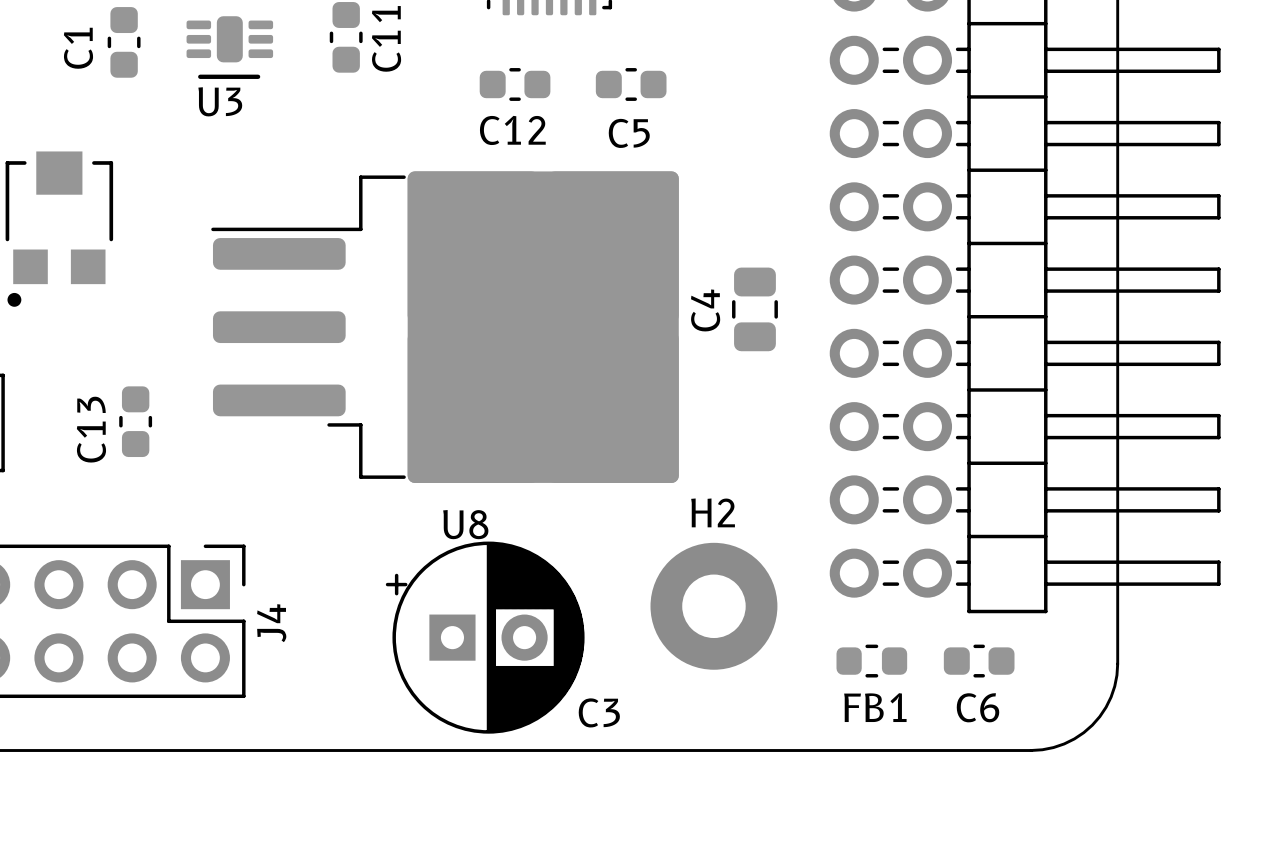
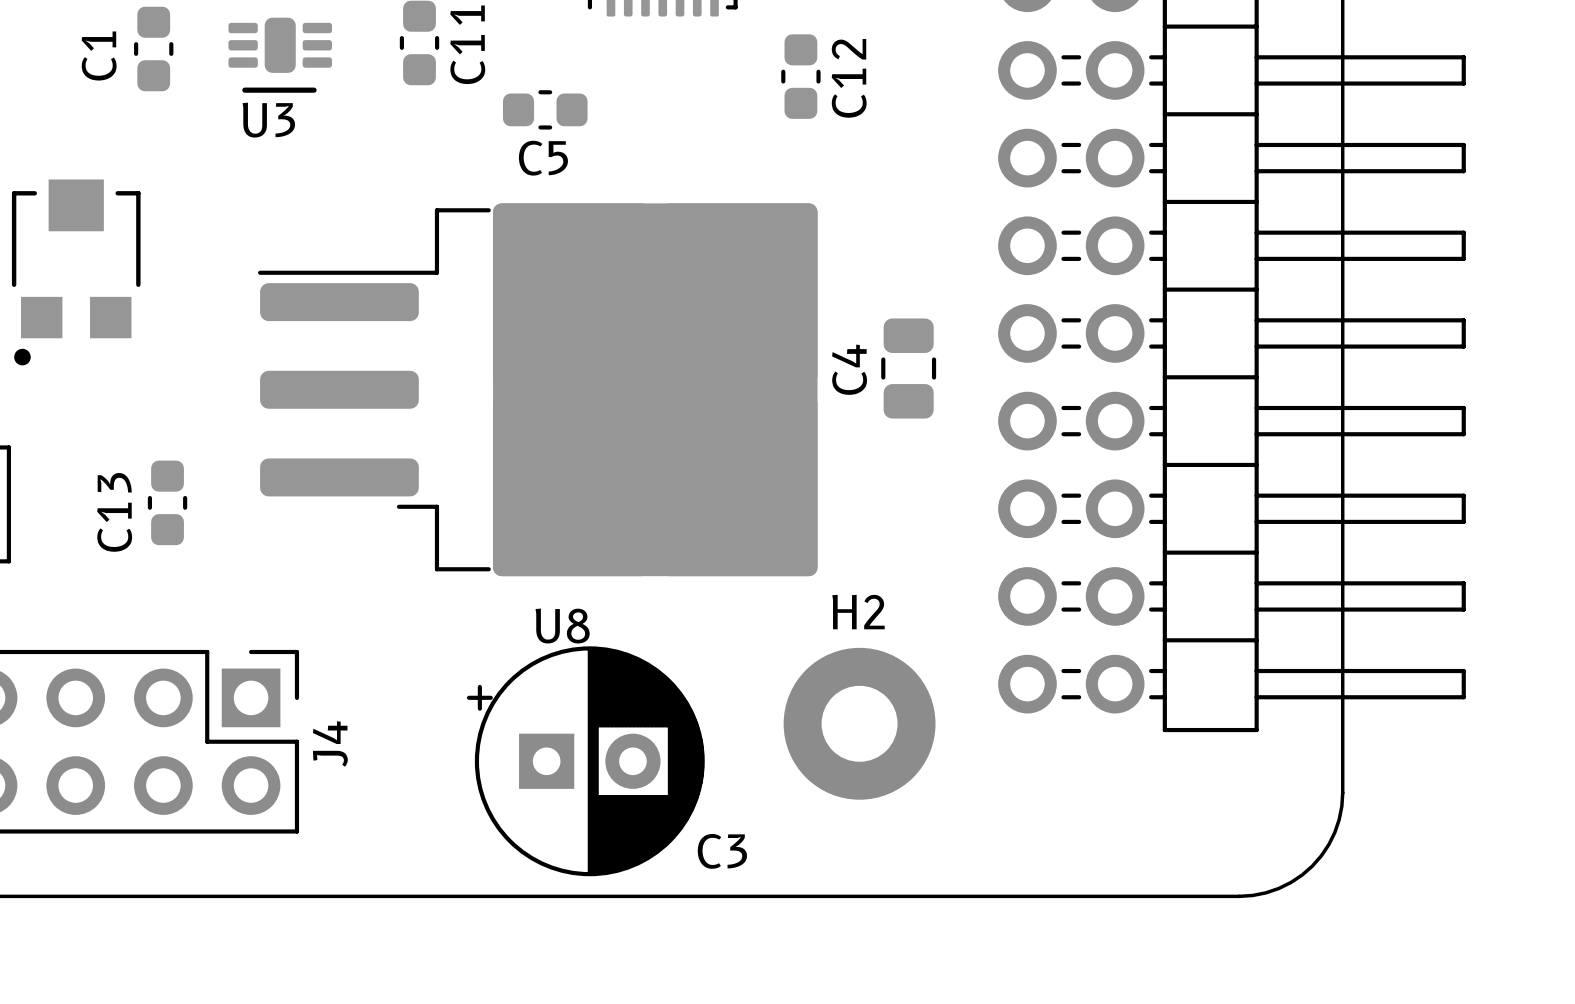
C12 rotation: 0° (515, 84) -> 90° clockwise (800, 76)
C12 position: (515, 84) -> (800, 76)
C5 position: (631, 84) -> (545, 109)
C12 name position: C12 (512, 130) -> C12 (849, 78)
C5 name position: C5 (629, 133) -> C5 (543, 158)
FB1: (871, 661) -> none
C6: (979, 661) -> none

